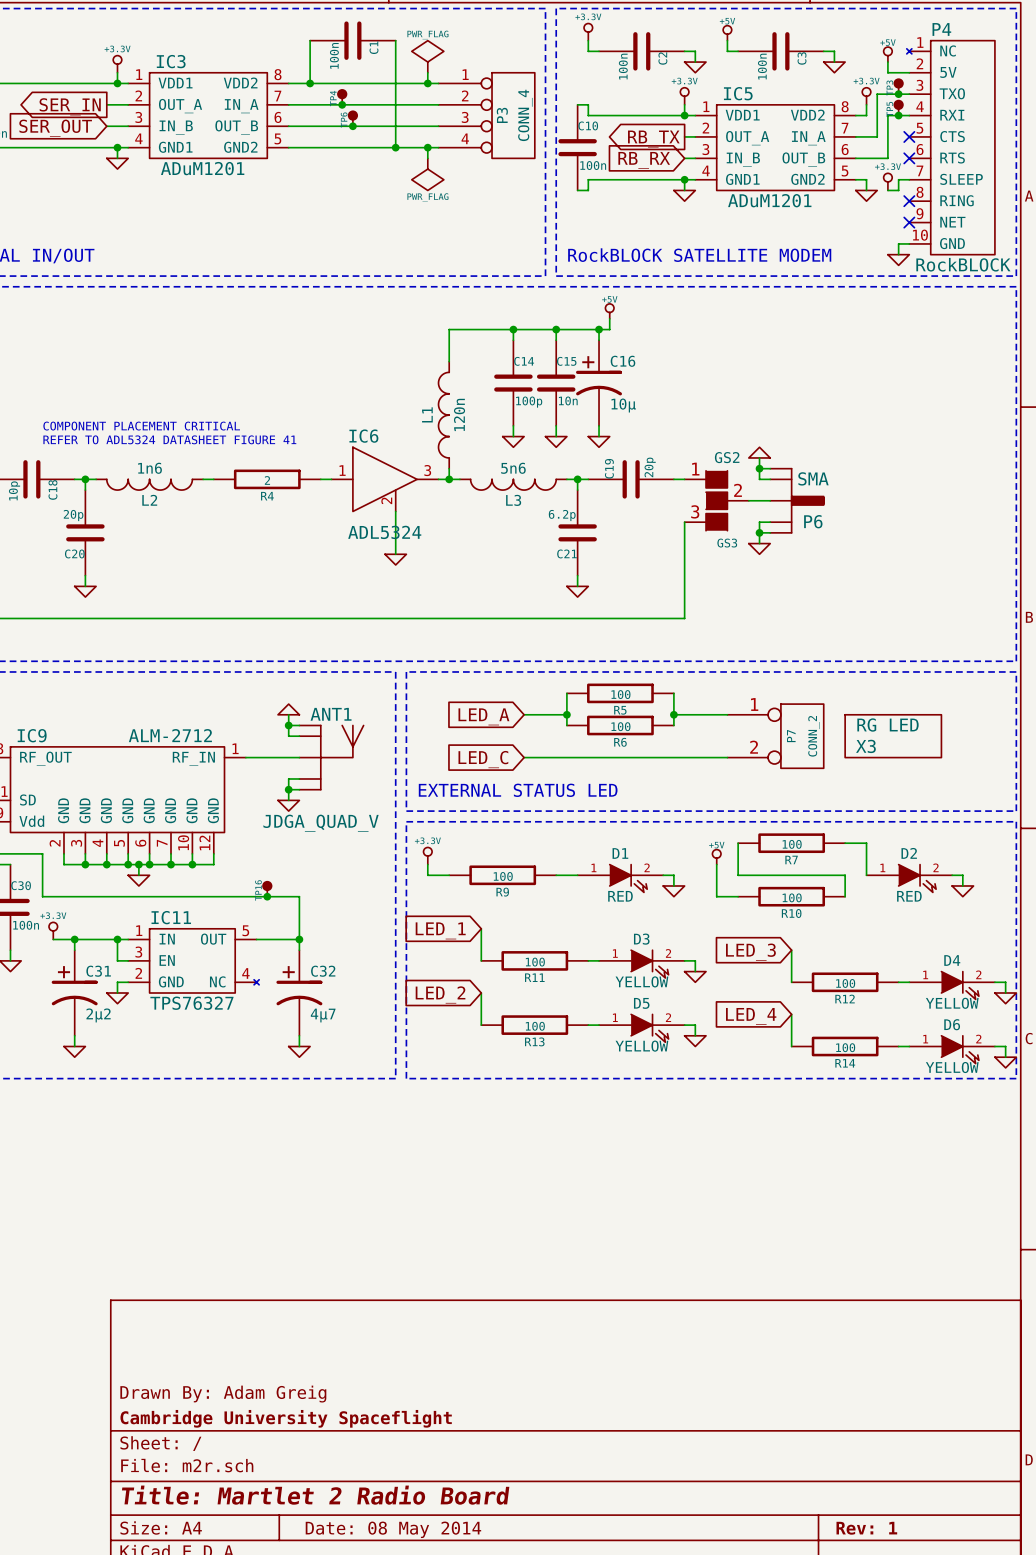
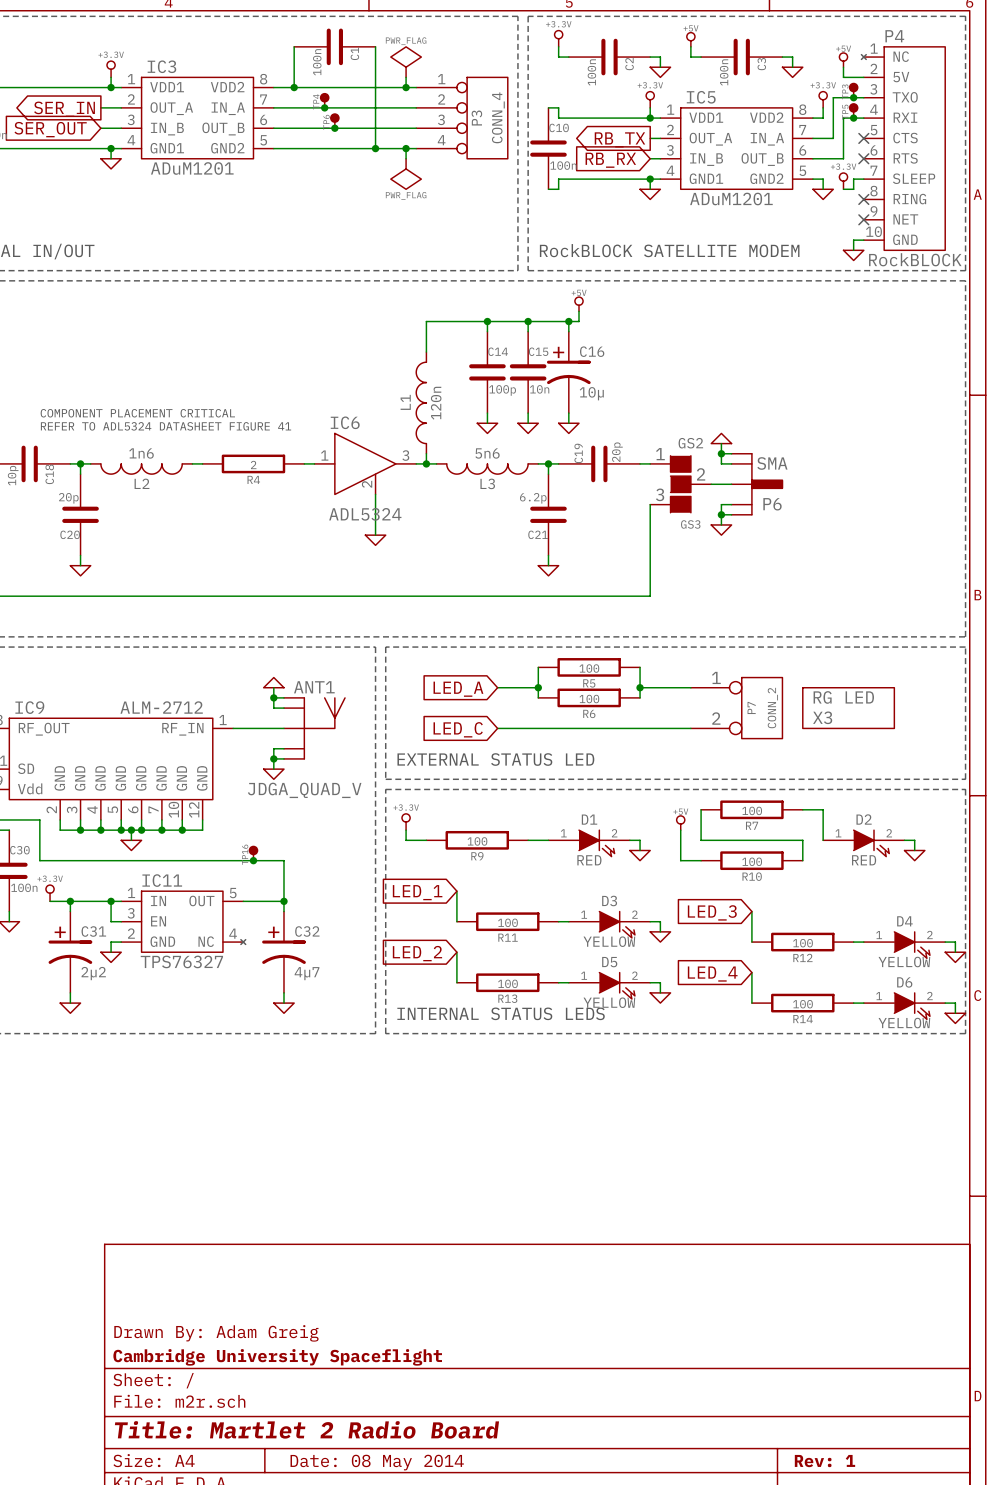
text: none -> INTERNAL STATUS LEDS (501, 1013)

